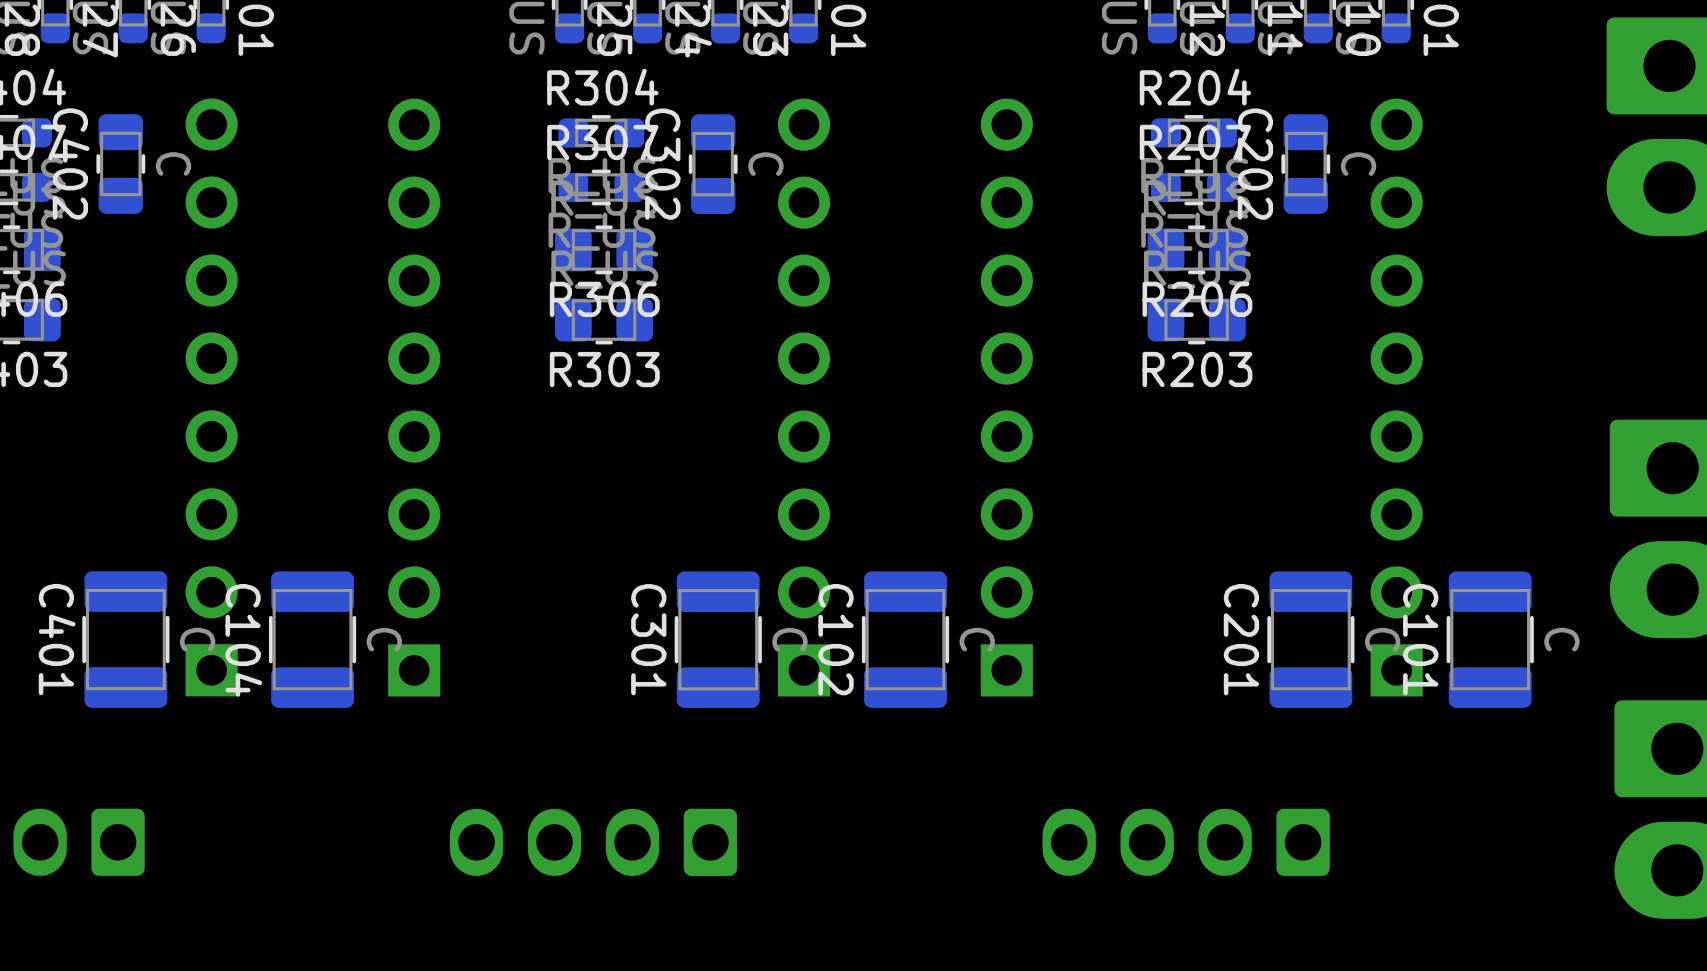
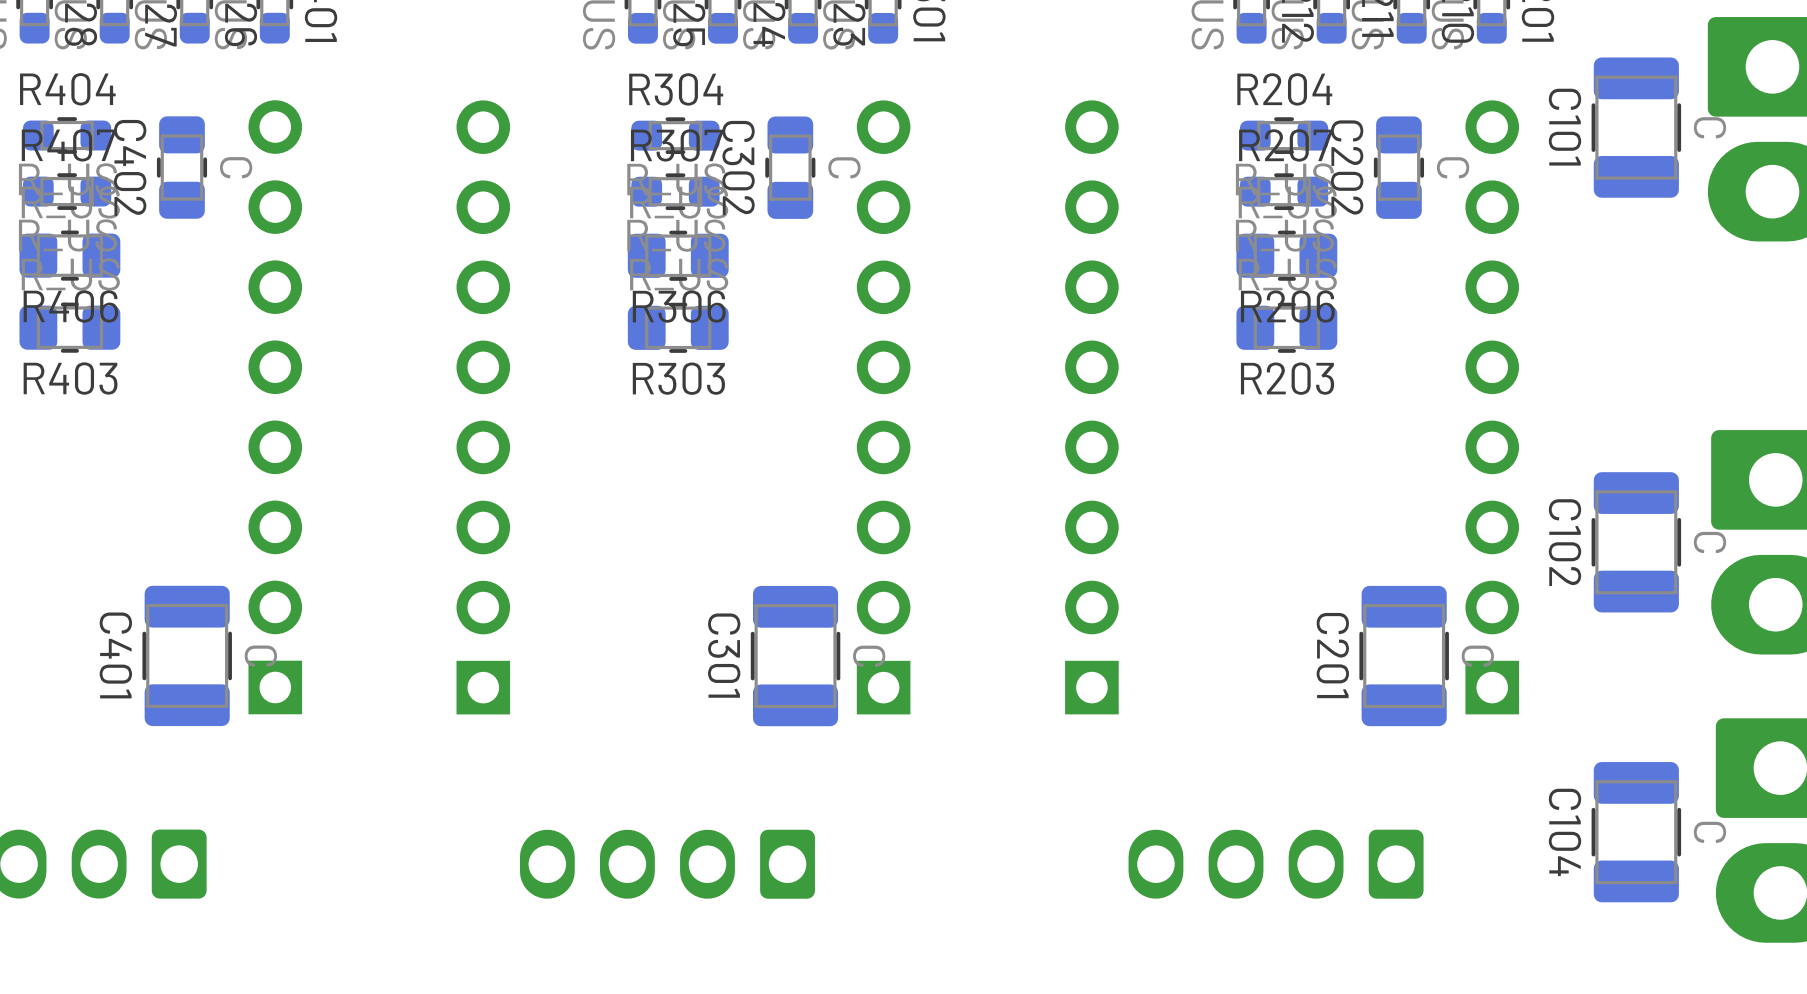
C104 position: (312, 639) -> (1636, 832)
C102 position: (905, 639) -> (1636, 542)
C101 position: (1490, 639) -> (1636, 127)

